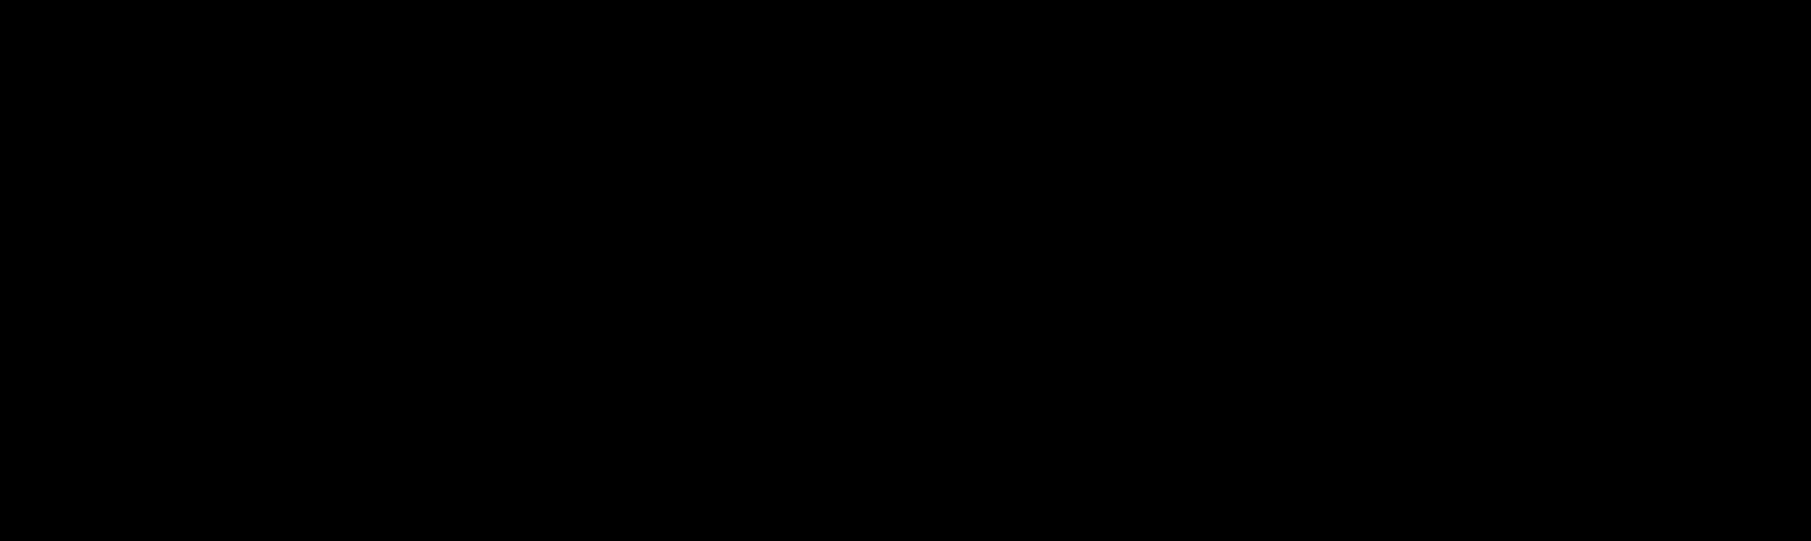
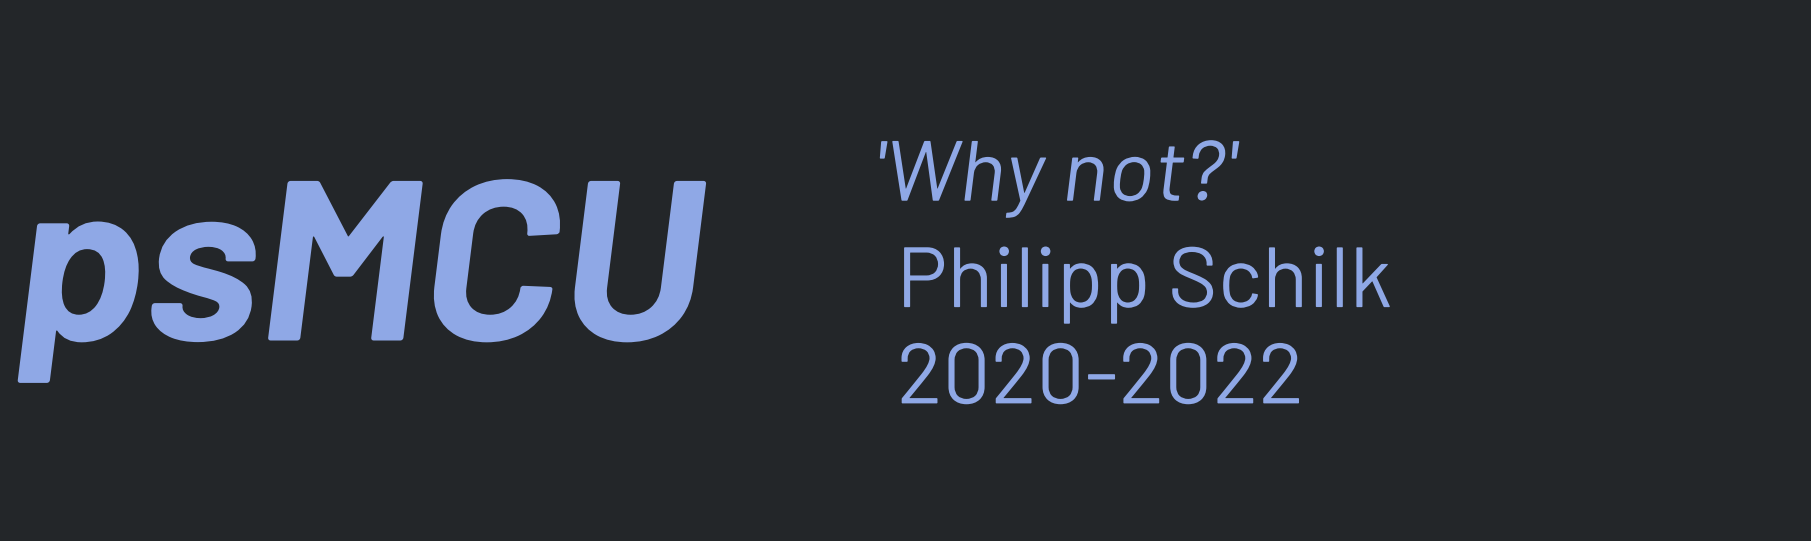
text: none -> 'Why not?' (1059, 178)
text: none -> psMCU (361, 280)
text: none -> Philipp Schilk (1146, 285)
text: none -> 2020-2022 (1100, 373)

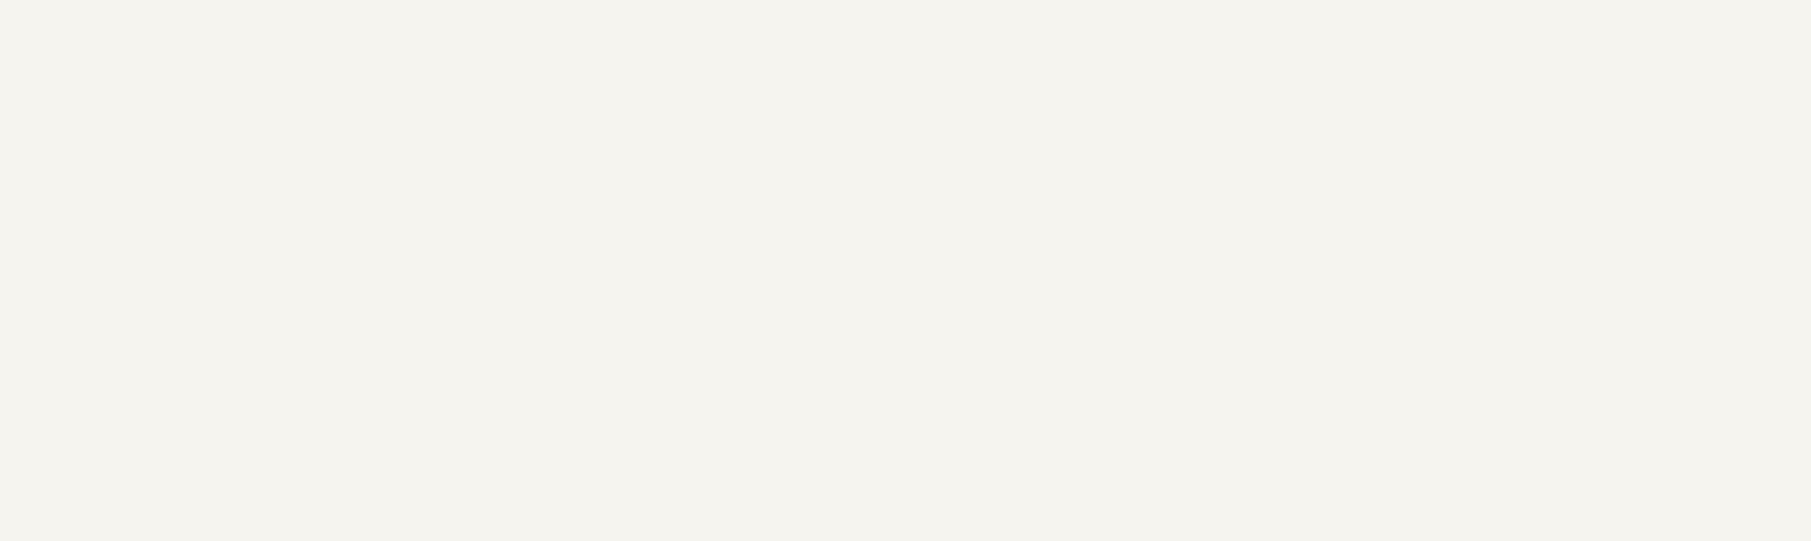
text: 'Why not?' (1059, 178) -> none
text: psMCU (361, 280) -> none
text: Philipp Schilk (1146, 285) -> none
text: 2020-2022 (1100, 373) -> none

